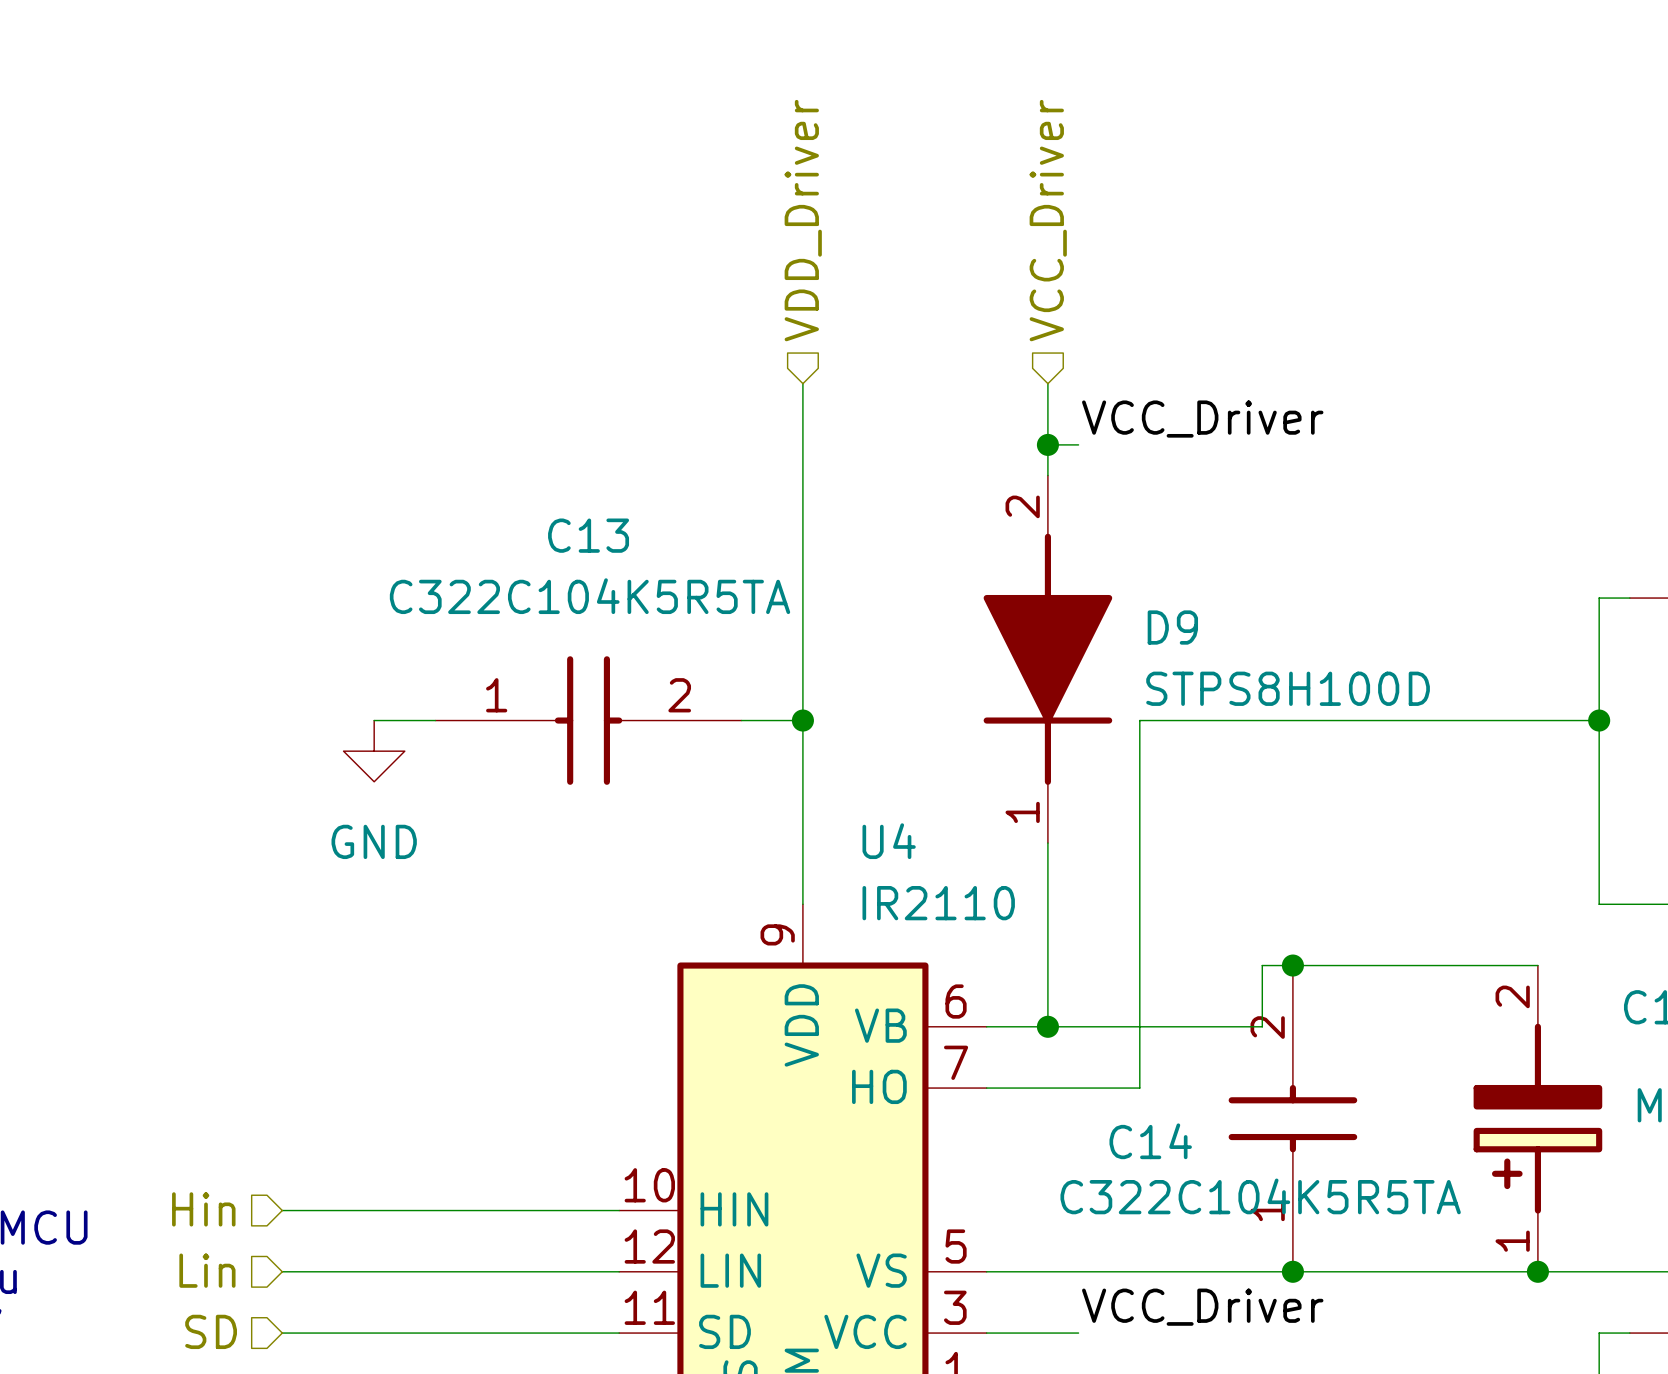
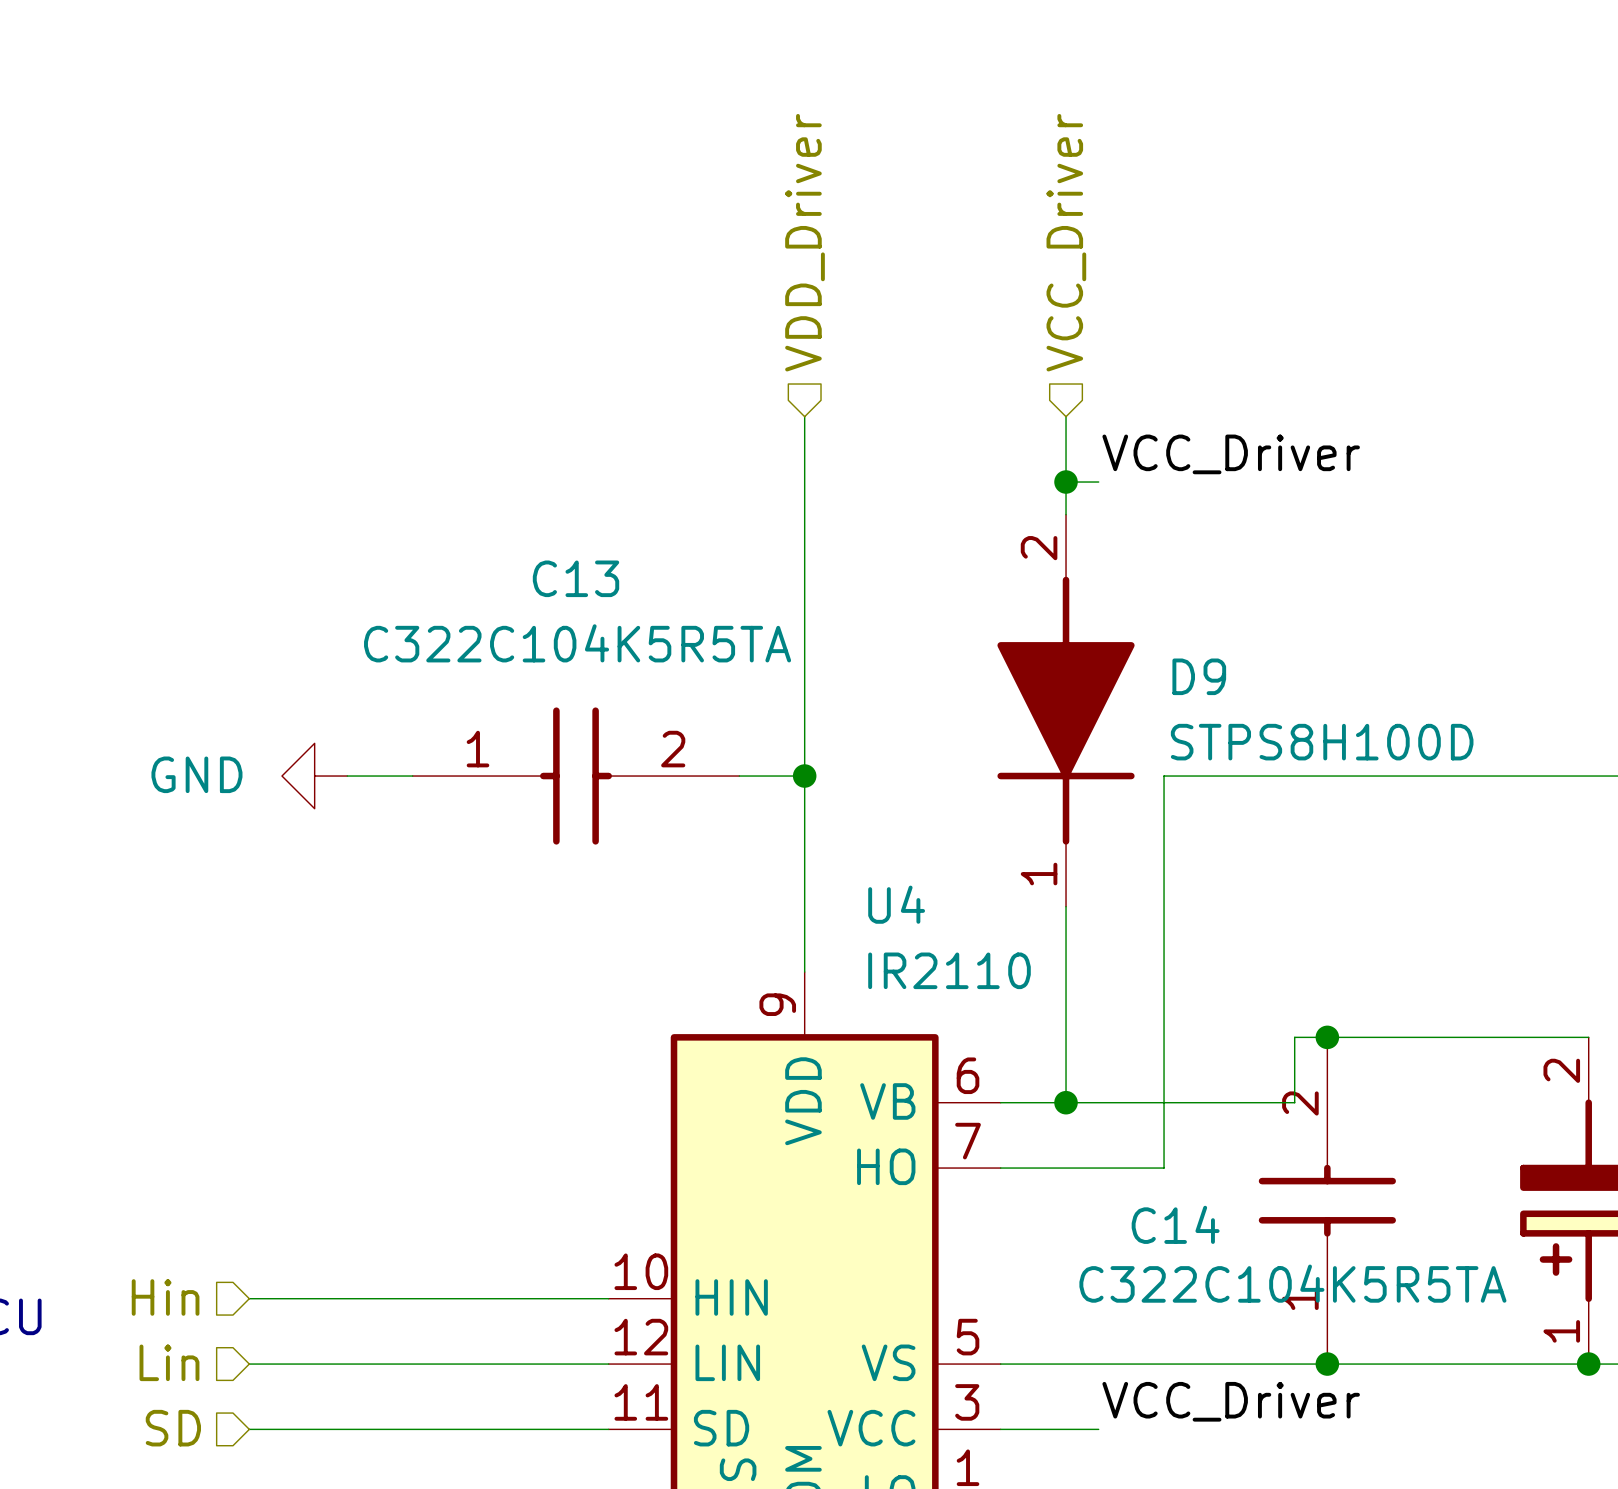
power symbol rotation: 0° (374, 751) -> 90° clockwise (314, 776)
power symbol position: GND (374, 751) -> GND (314, 776)

